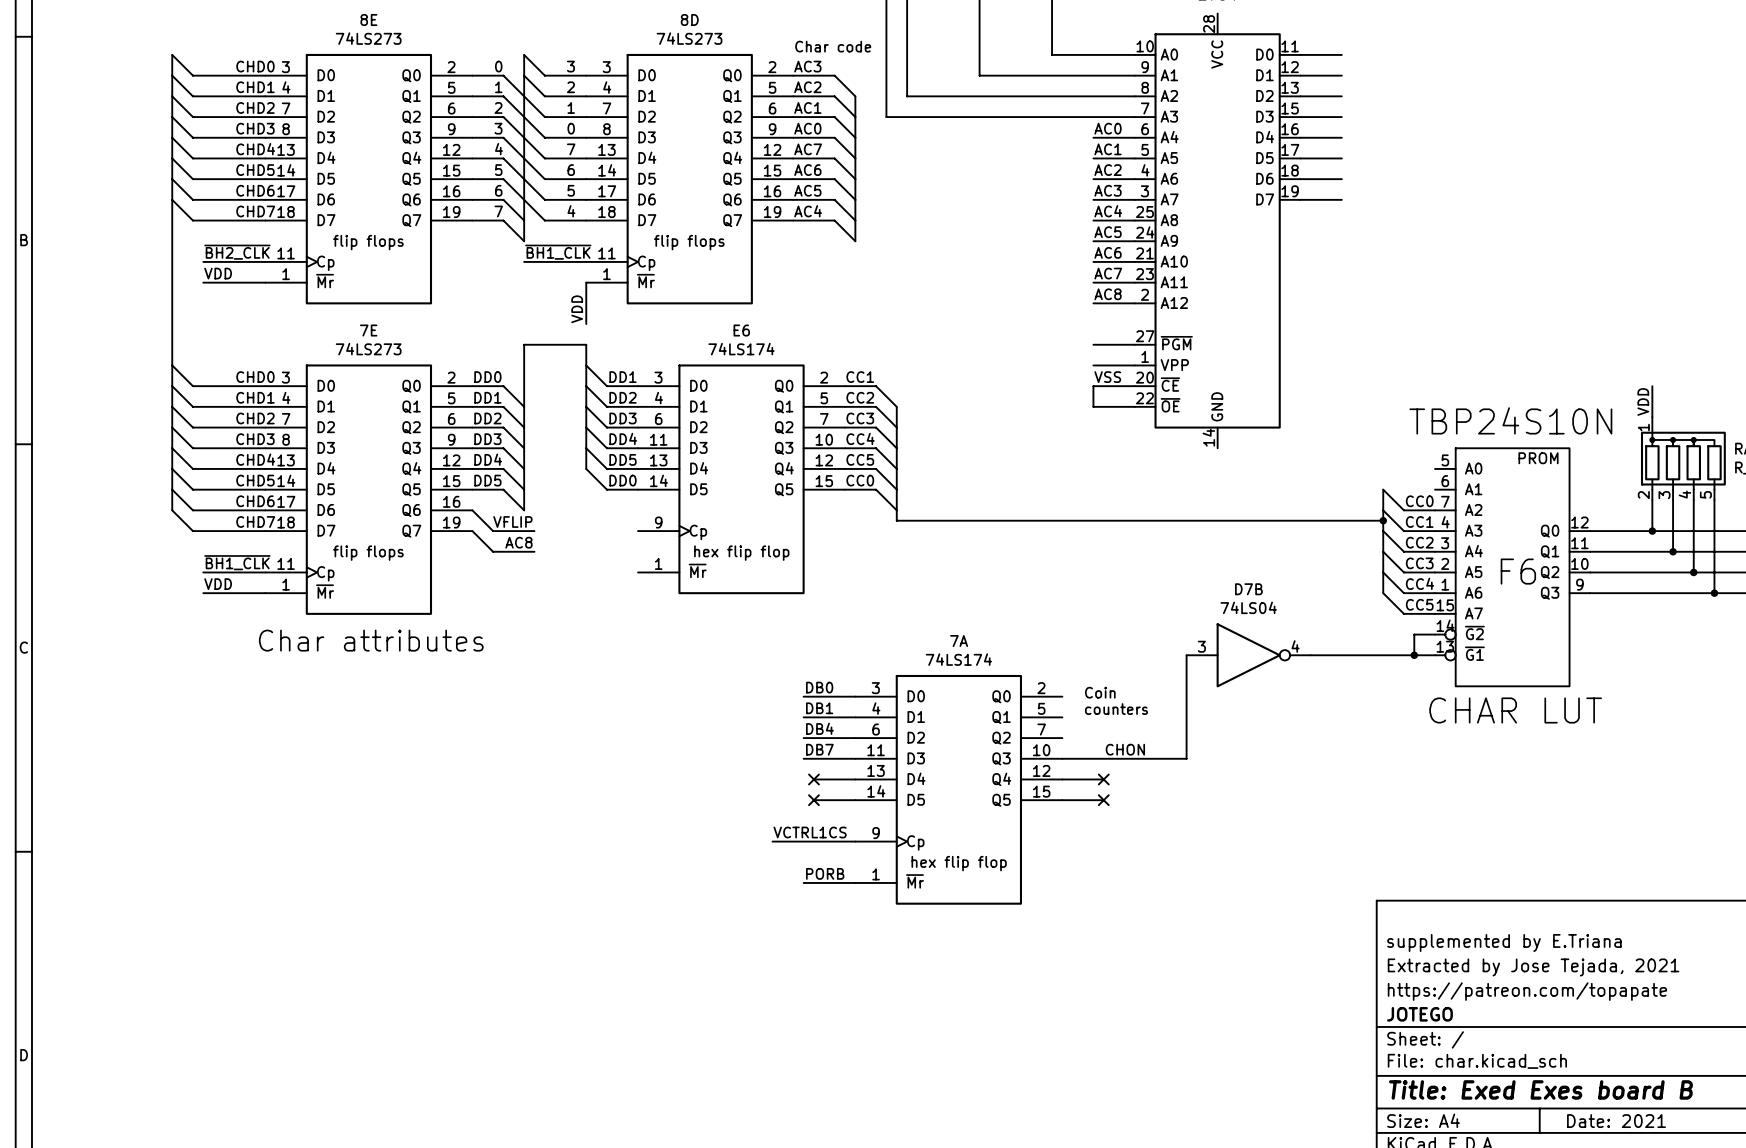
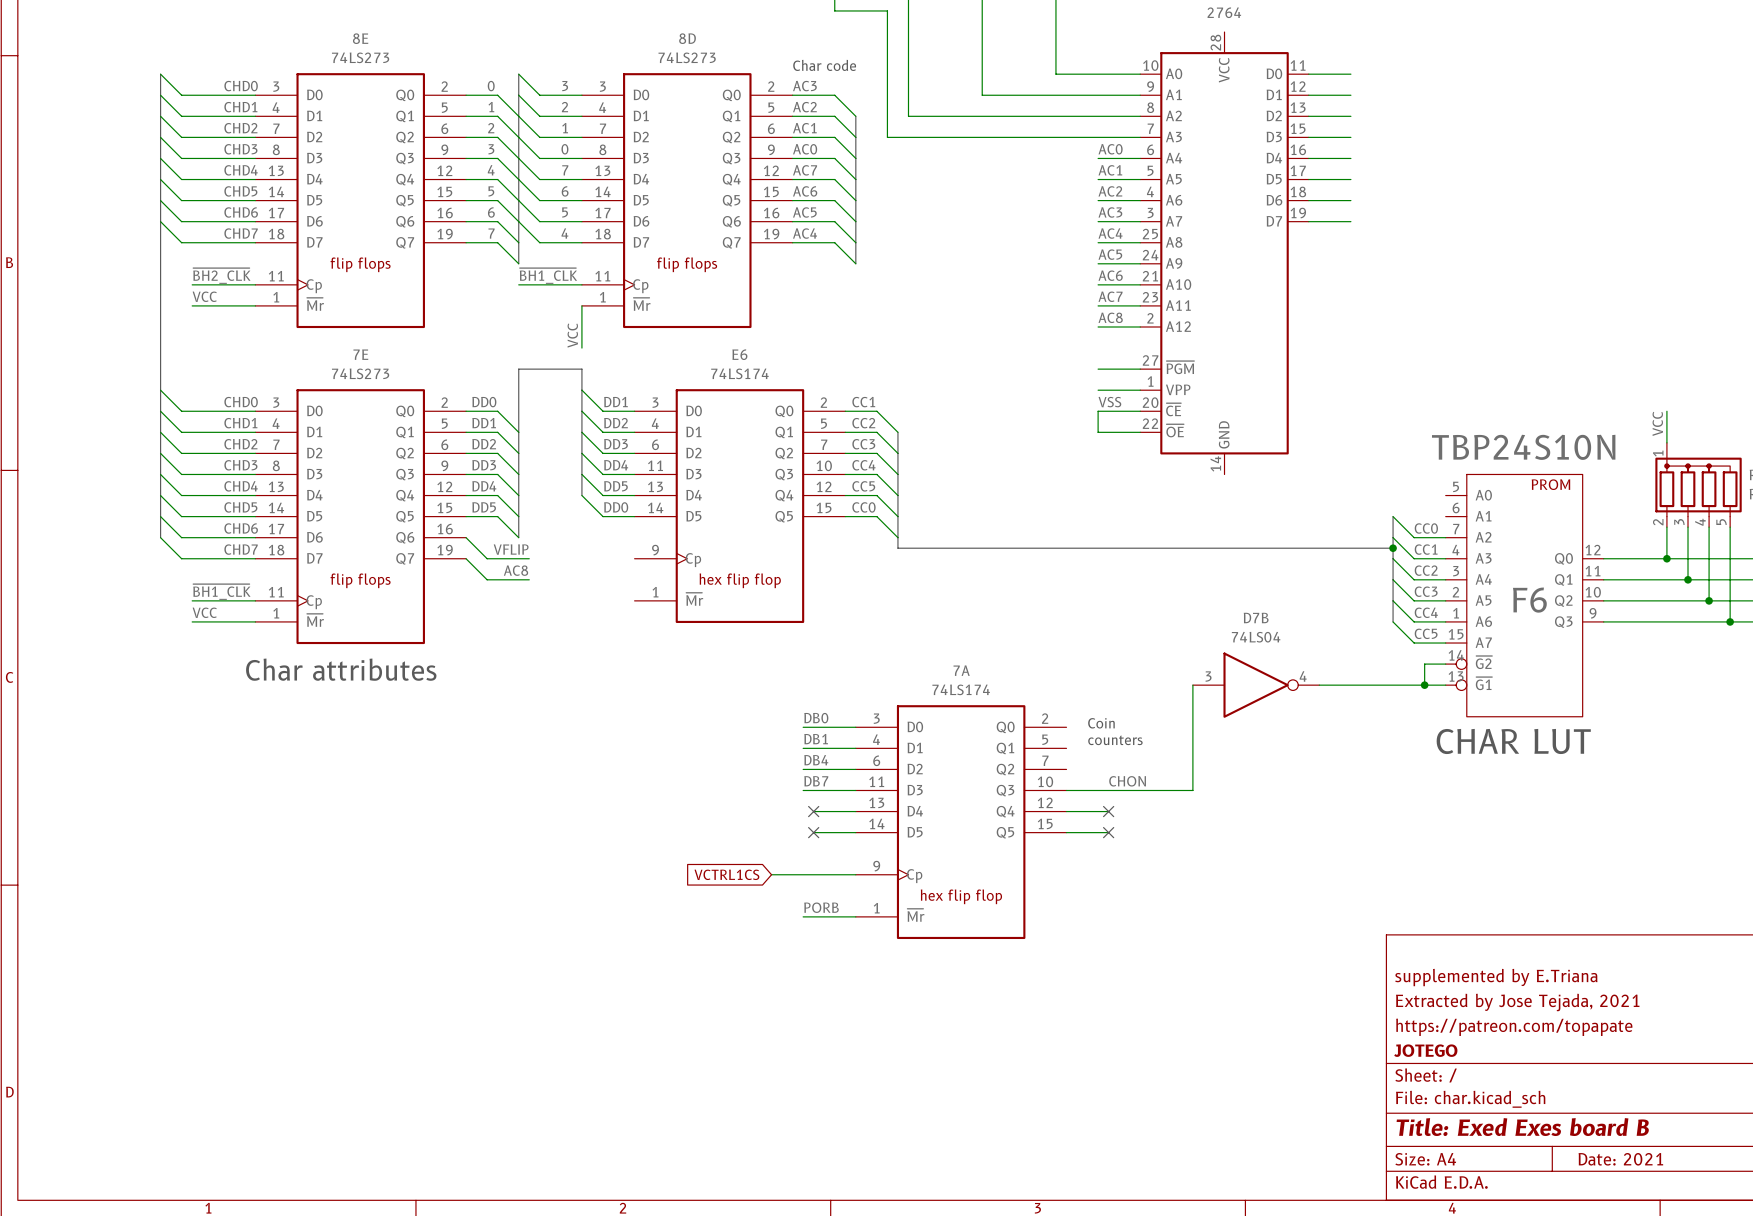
label: VDD (218, 273) -> VCC (204, 296)
label: VDD (577, 309) -> VCC (572, 335)
label: VDD (1643, 401) -> VCC (1657, 423)
label: VDD (218, 584) -> VCC (204, 612)
label: VCTRL1CS (810, 832) -> none
global label: none -> VCTRL1CS (726, 874)

